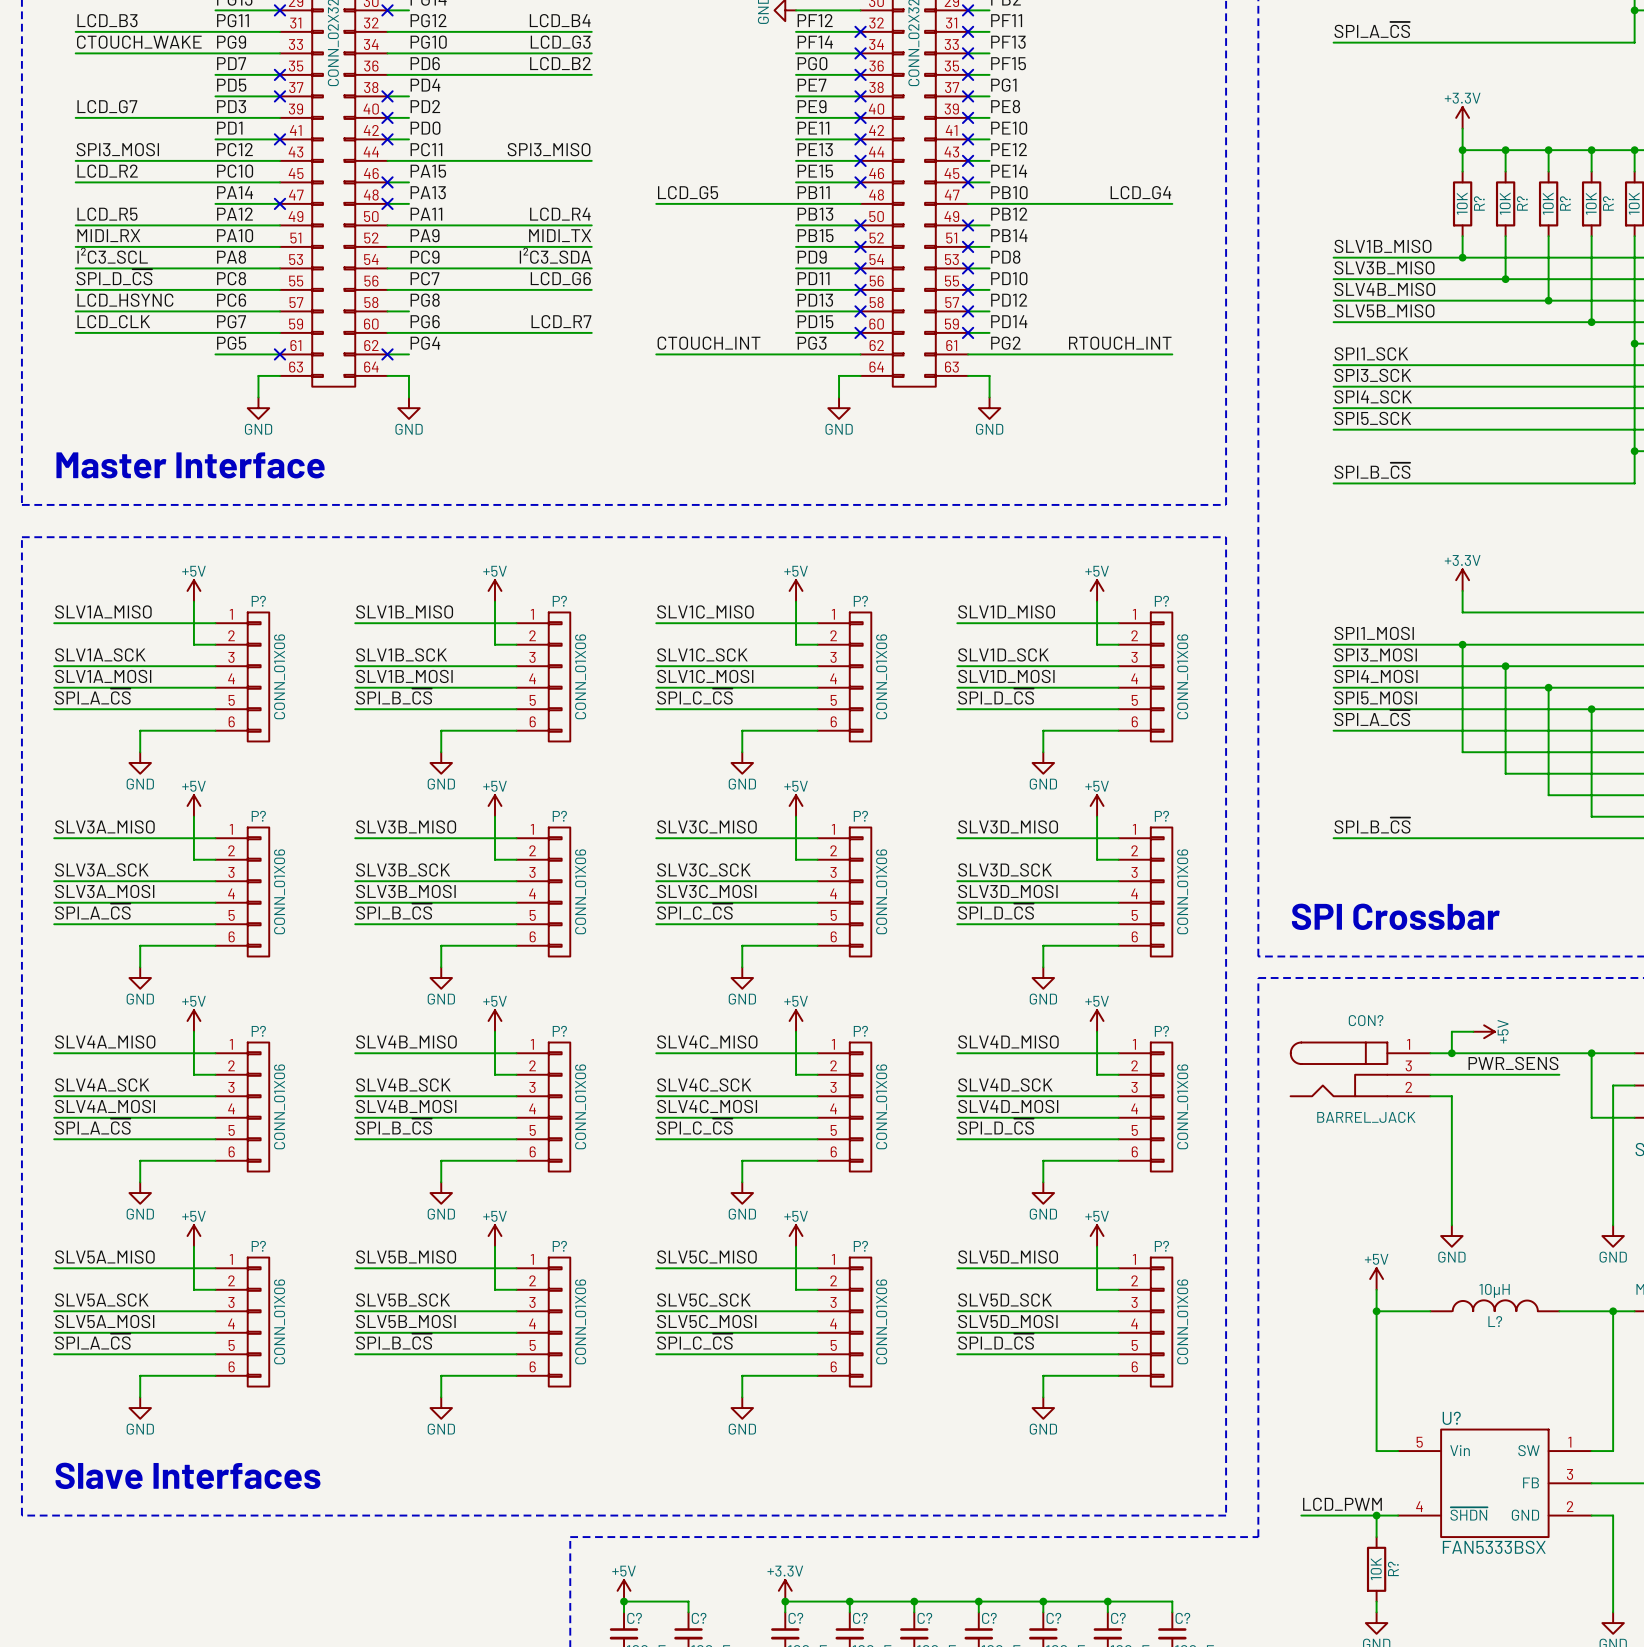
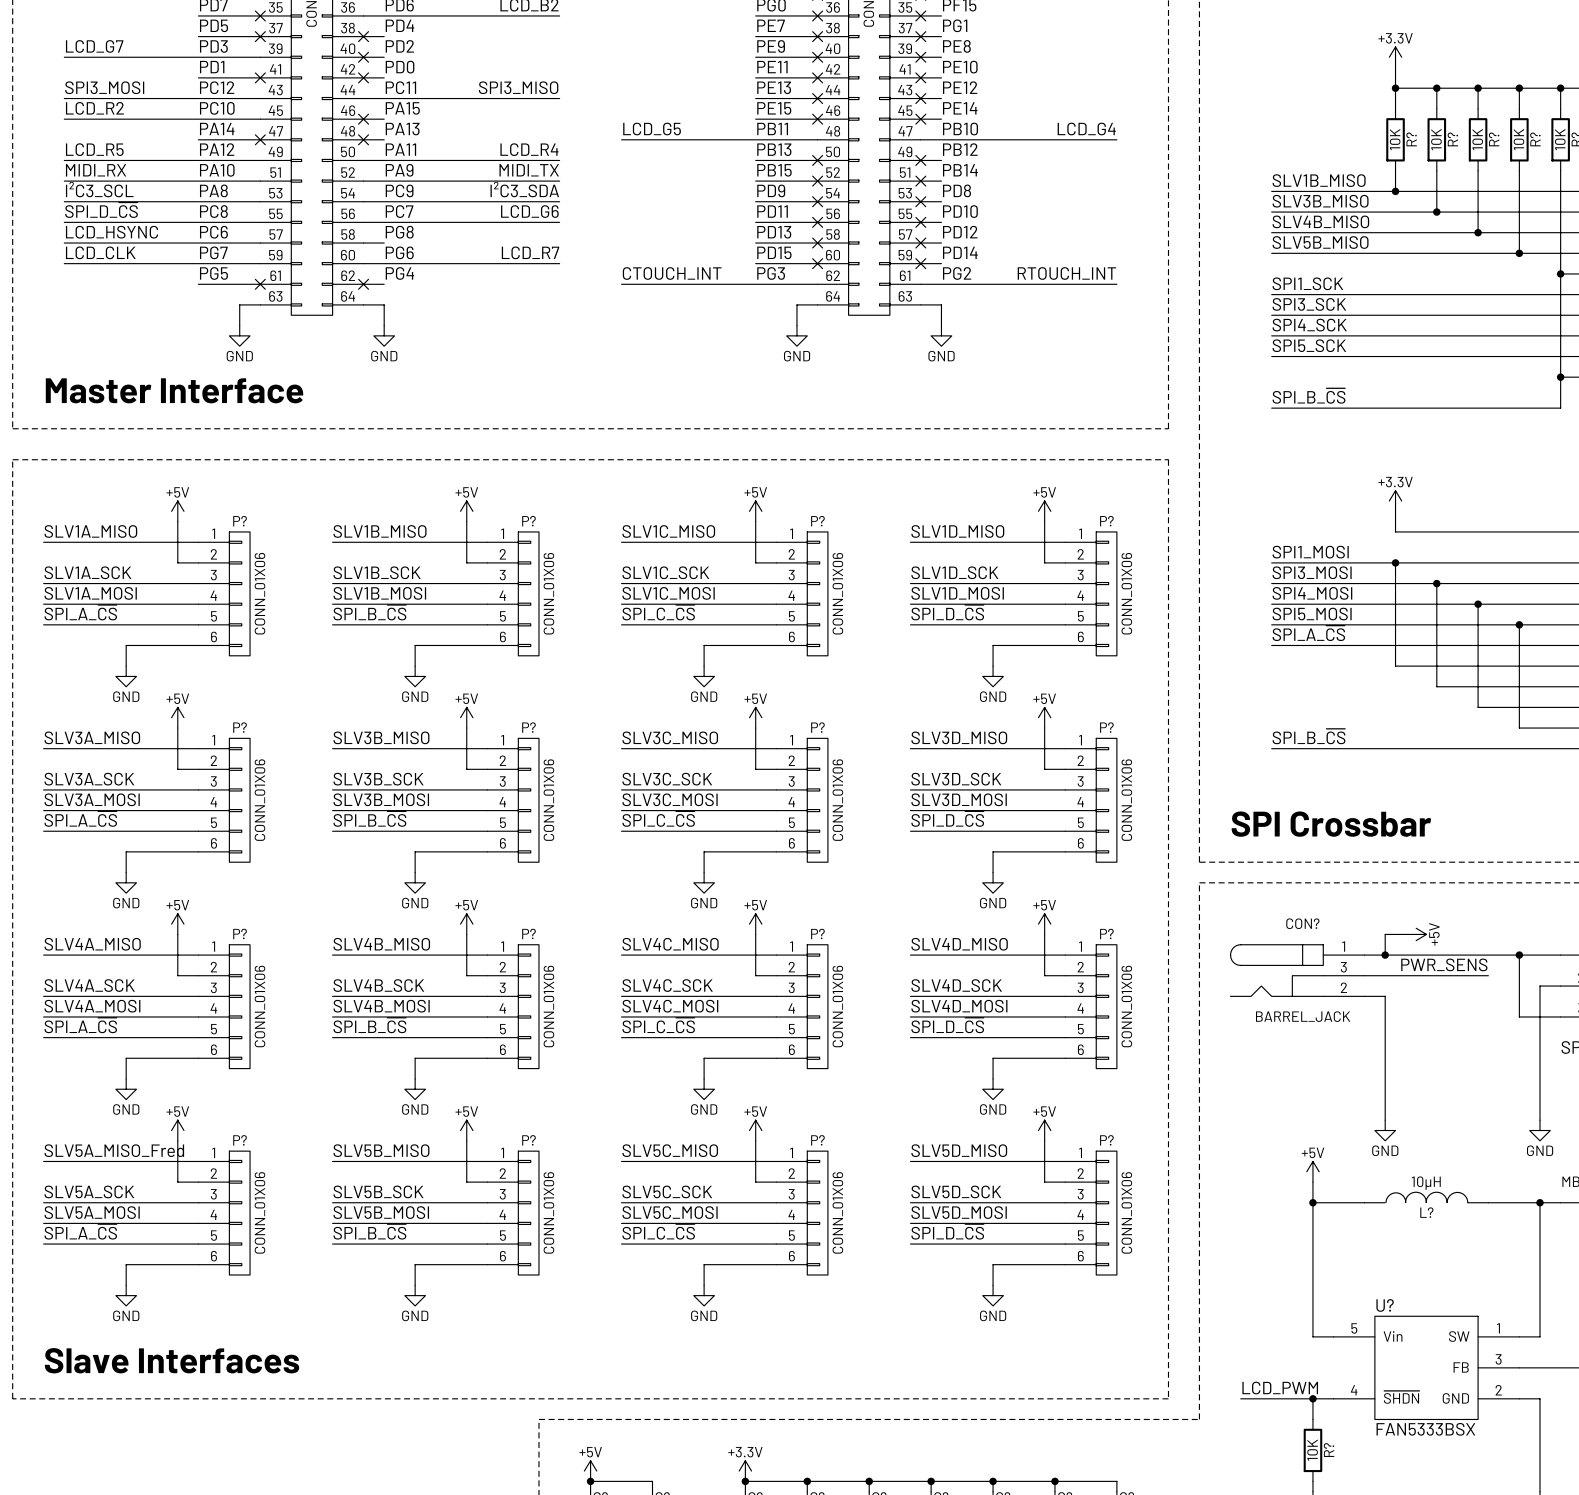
label: SLV5A_MISO (104, 1257) -> SLV5A_MISO_Fred (114, 1150)

